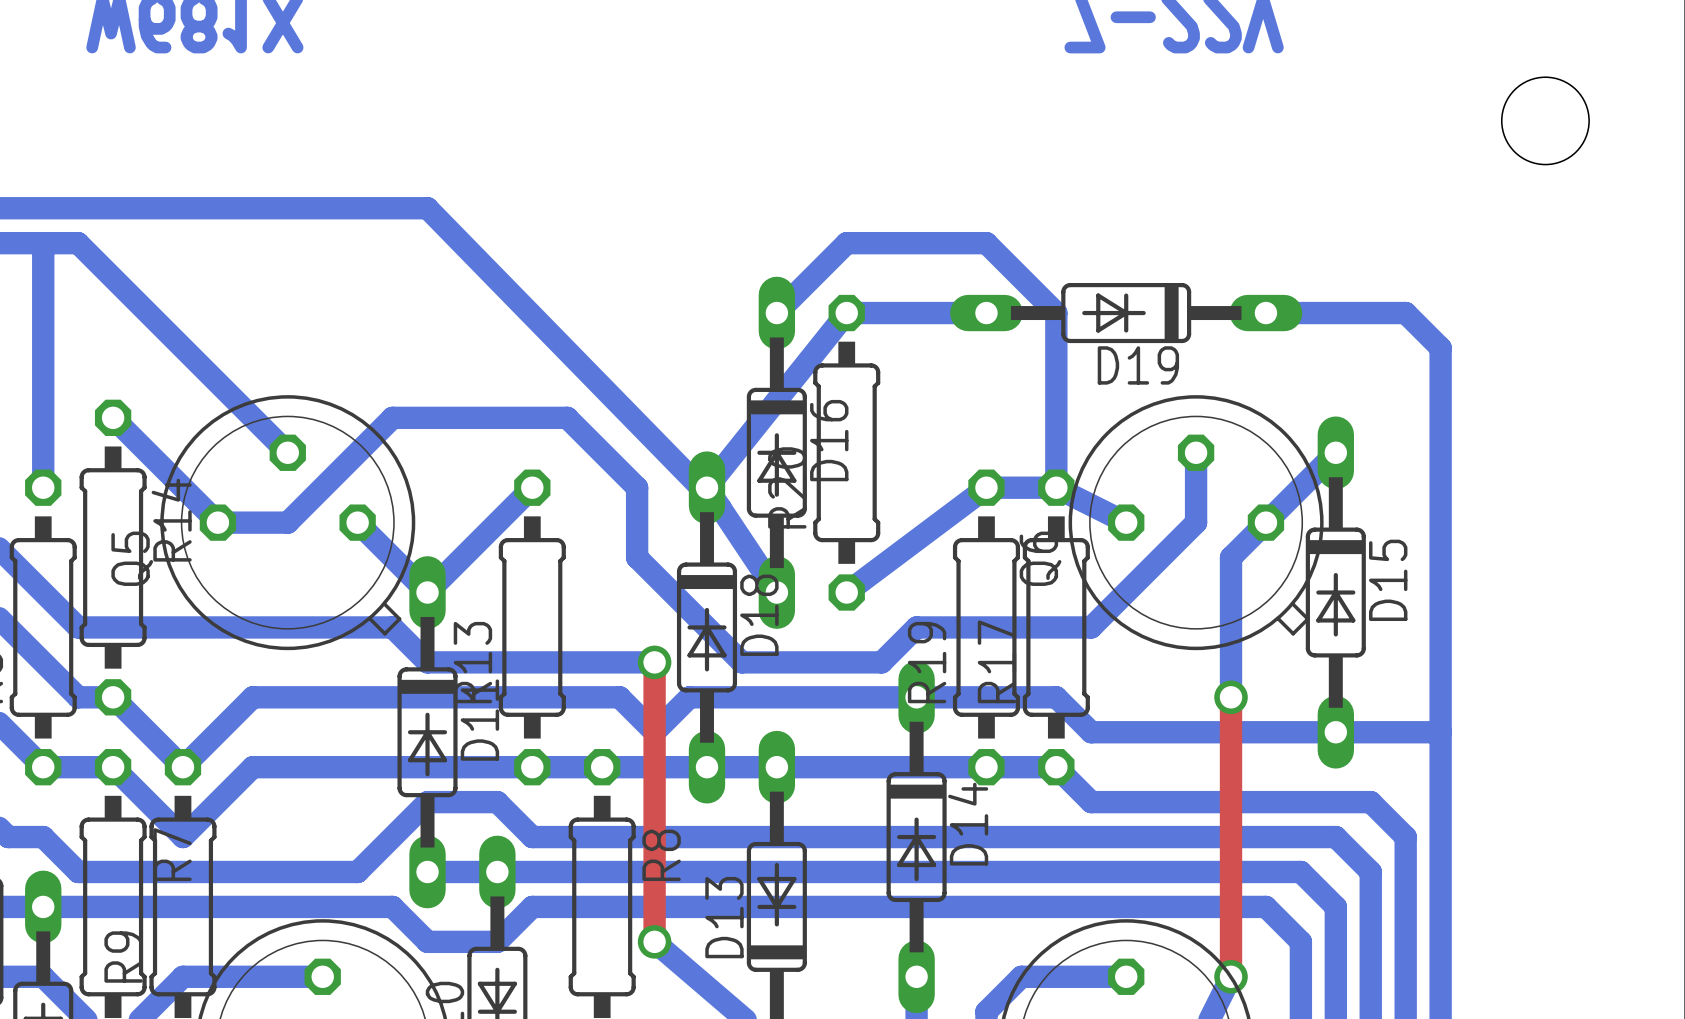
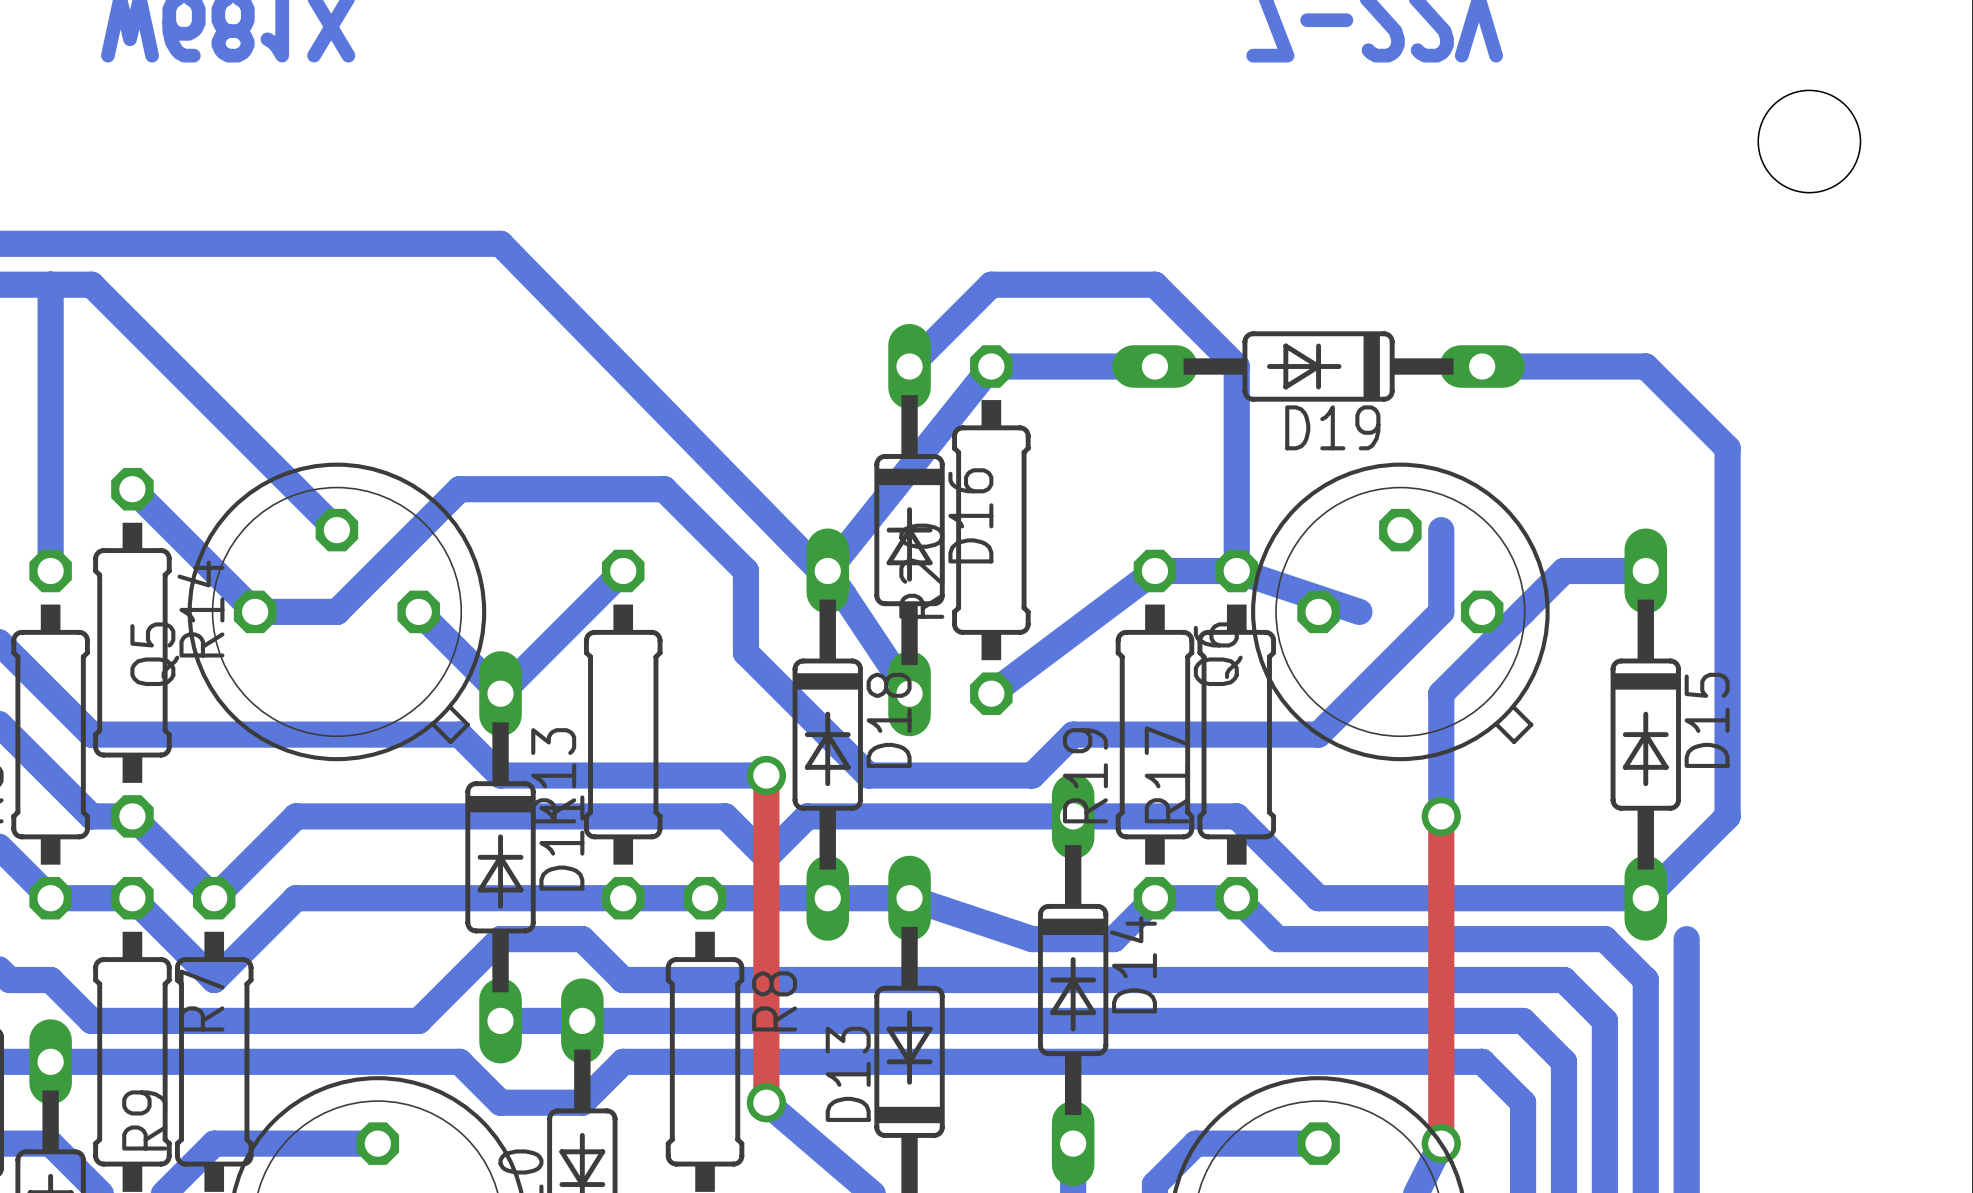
bottom track: (1440, 347) (1440, 802) -> (1686, 407) (1727, 448) (1727, 816) (1645, 898) (1318, 898) (1277, 857)
bottom track: (1196, 452) (1196, 522) (1091, 627) -> (1441, 530) (1441, 611) (1318, 734) (1277, 734)
bottom track: (1335, 452) (1231, 557) (1231, 592) -> (1645, 571) (1563, 571) (1441, 693)
bottom track: (1056, 487) (1126, 522) -> (1236, 571) (1359, 611)
D15 position: (1335, 592) -> (1645, 734)
bottom track: (1091, 732) (1440, 732) -> none
bottom track: (776, 767) (986, 767) -> (909, 898) (1032, 939) (1114, 939) (1154, 898)

